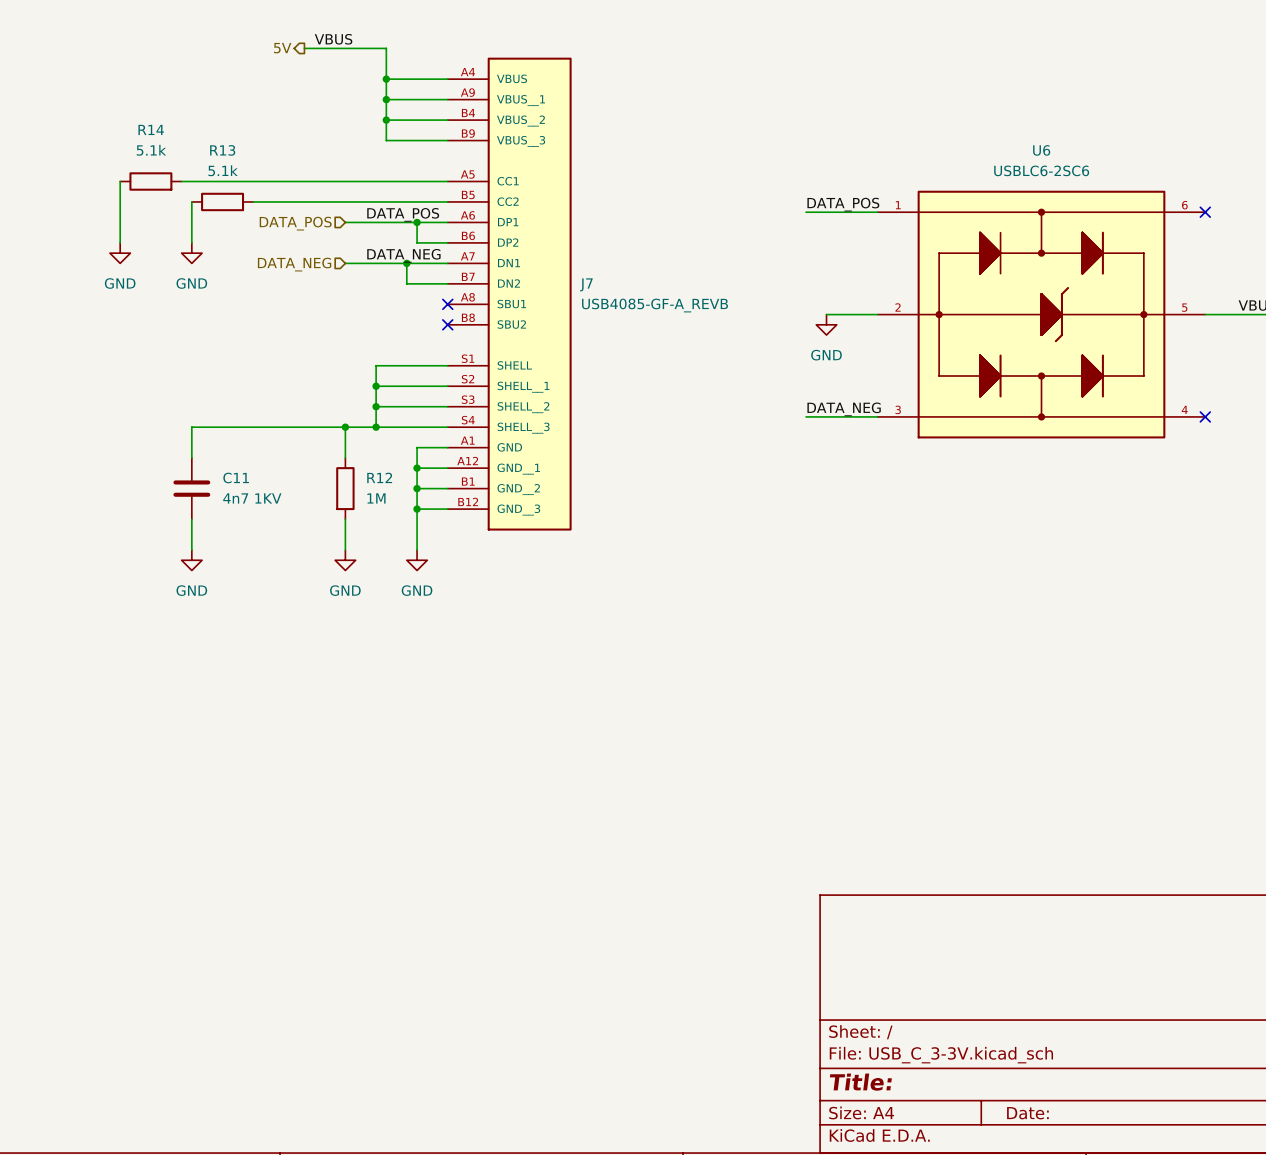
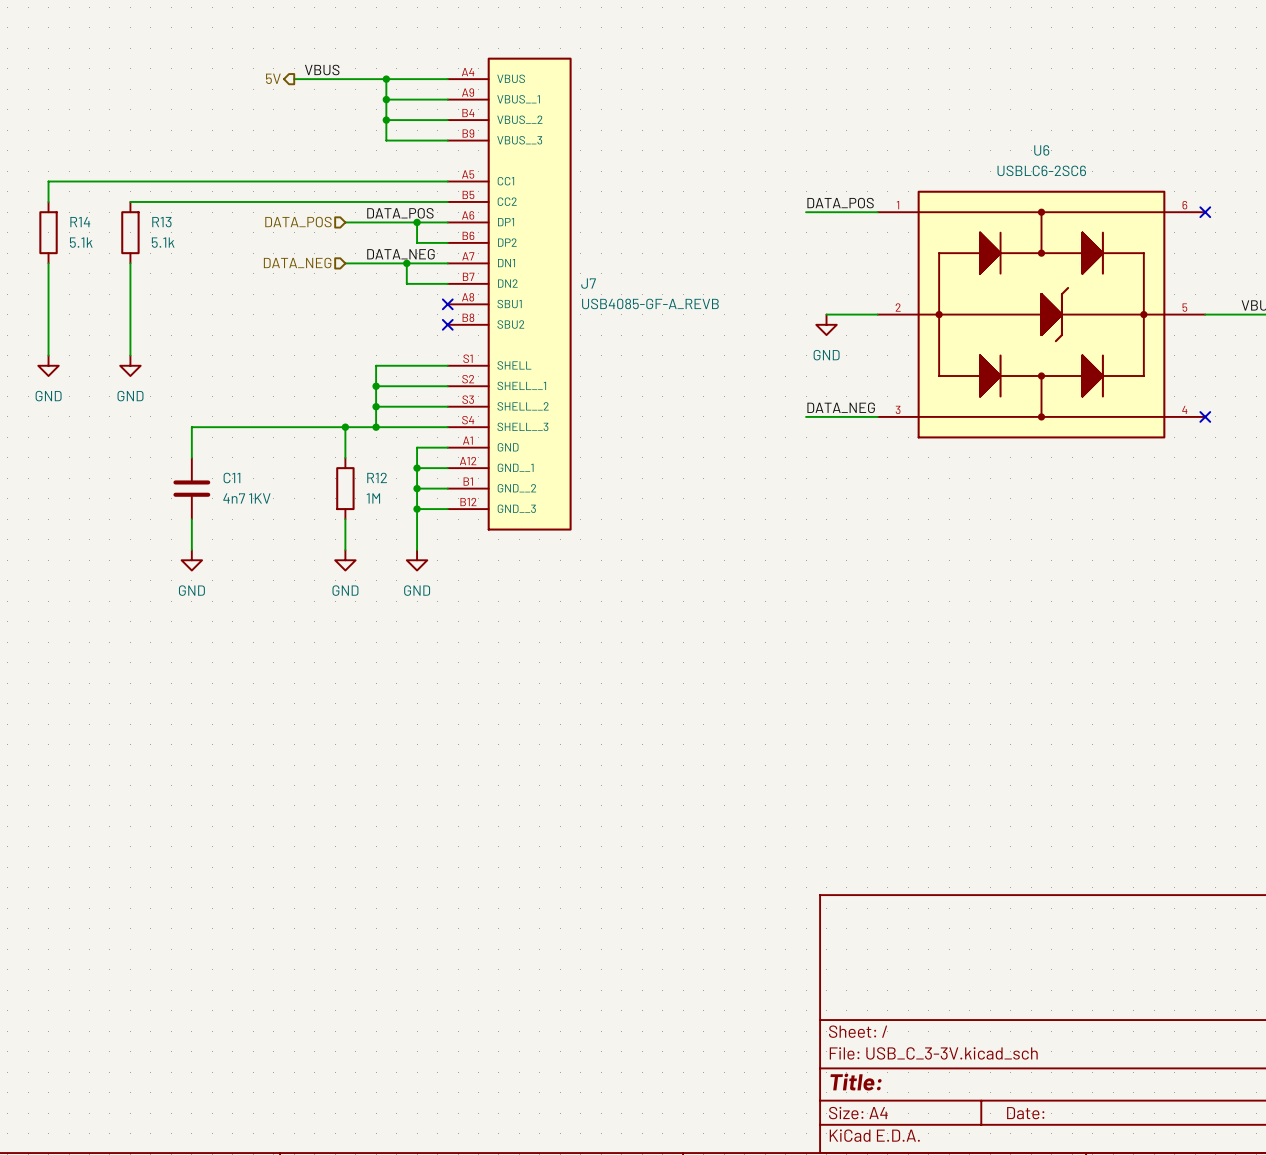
label position: VBUS (333, 39) -> VBUS (322, 70)
hierarchical label position: 5V (282, 48) -> 5V (273, 78)
wire: (304, 48) (386, 48) (386, 79) -> (294, 79) (386, 79)
R14 name position: R14 (151, 129) -> R14 (80, 222)
R13 name position: R13 (222, 150) -> R13 (161, 222)
wire: (120, 181) (120, 242) -> none
R14 rotation: 0° (150, 181) -> 90° clockwise (48, 232)
R14 position: (150, 181) -> (48, 232)
wire: none -> (181, 181) (48, 181) (48, 201)
wire: none -> (130, 201) (253, 201)
wire: (191, 201) (191, 242) -> none
R13 rotation: 0° (222, 201) -> 90° clockwise (130, 232)
R13 position: (222, 201) -> (130, 232)
power symbol: GND (120, 253) -> none
power symbol: GND (191, 253) -> none
wire: none -> (48, 263) (48, 355)
wire: none -> (130, 263) (130, 355)
power symbol: none -> GND (48, 365)
power symbol: none -> GND (130, 365)

